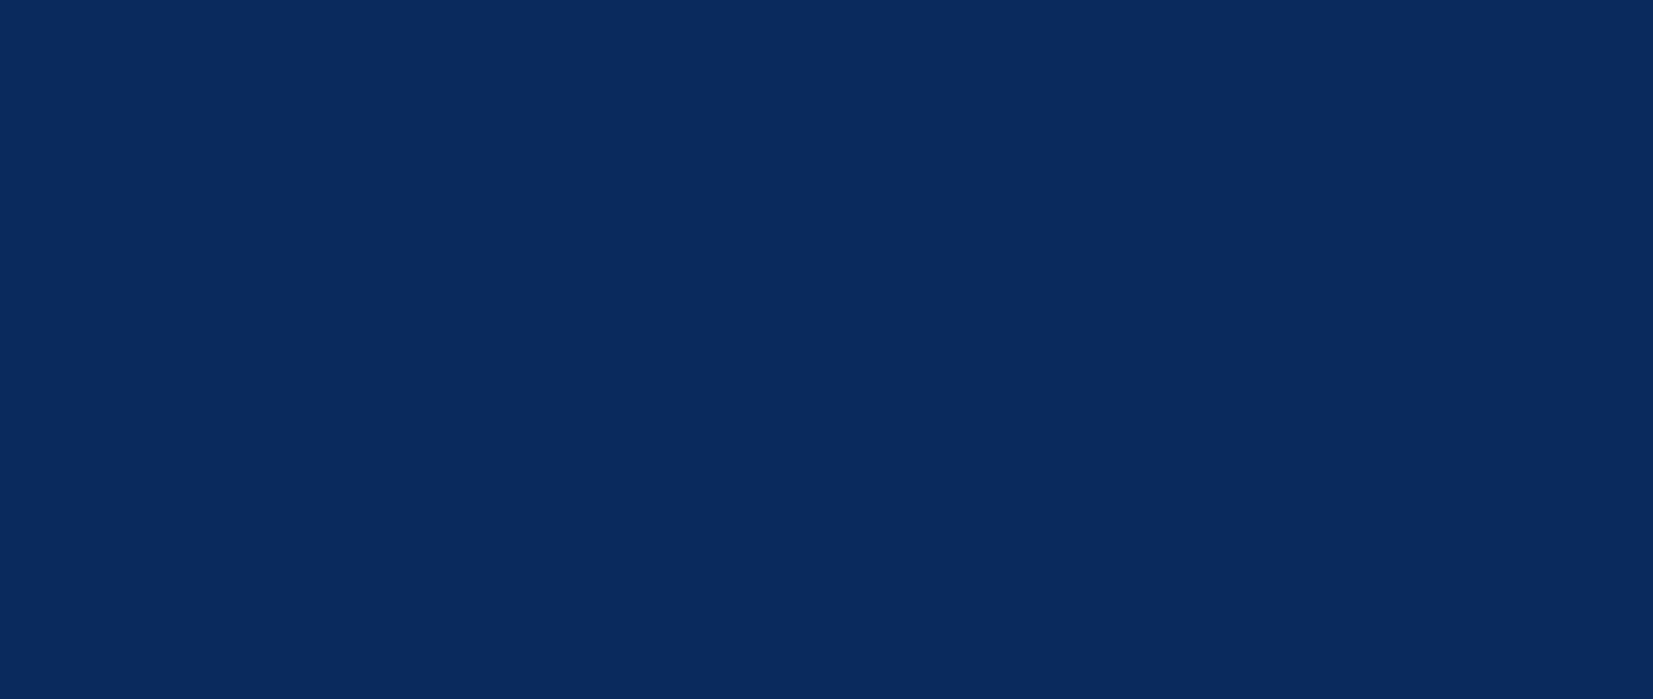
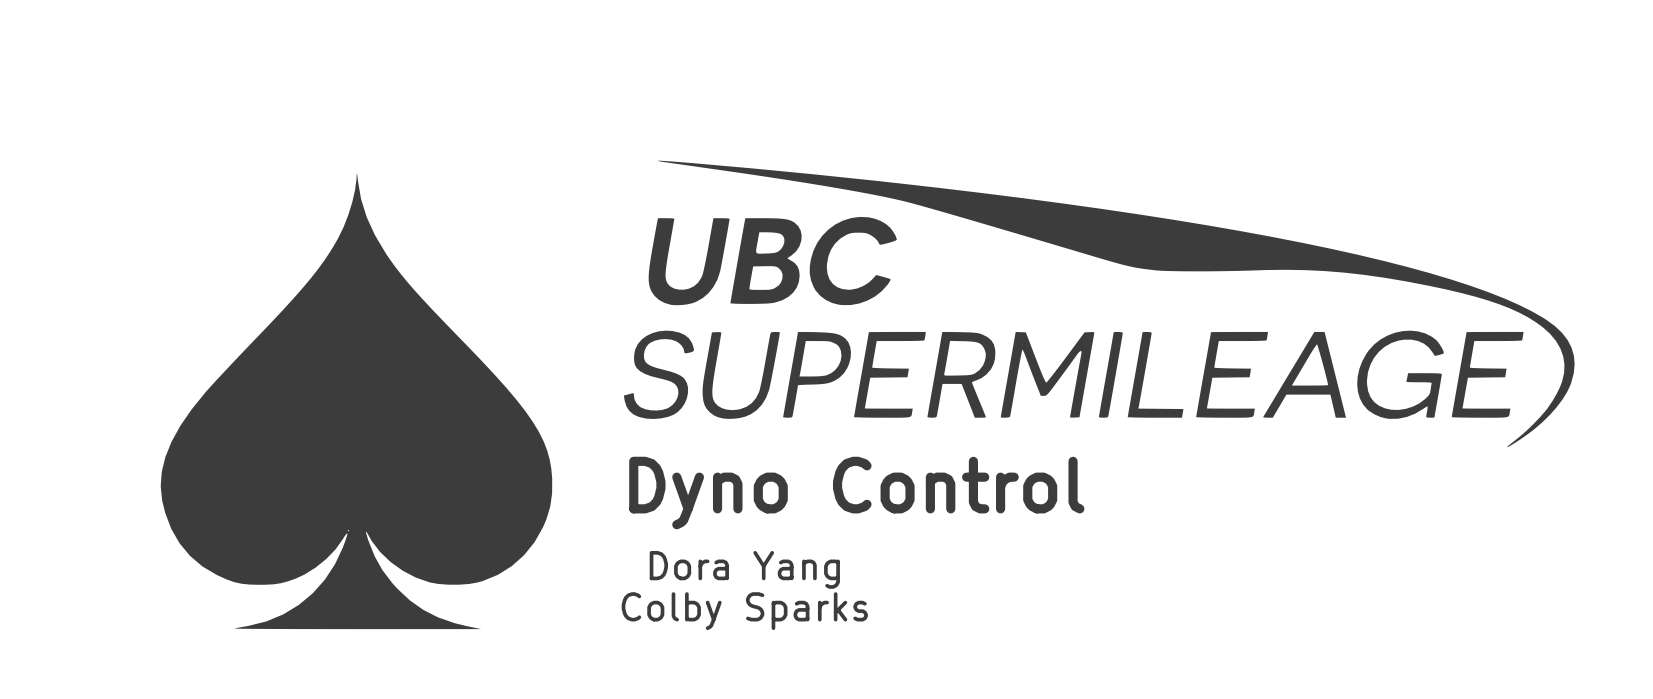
drawing: none -> [623, 160, 1575, 448]
part: none -> (356, 401)
text: none -> Dyno Control (856, 493)
text: none -> Dora Yang (744, 569)
text: none -> Colby Sparks (744, 611)

